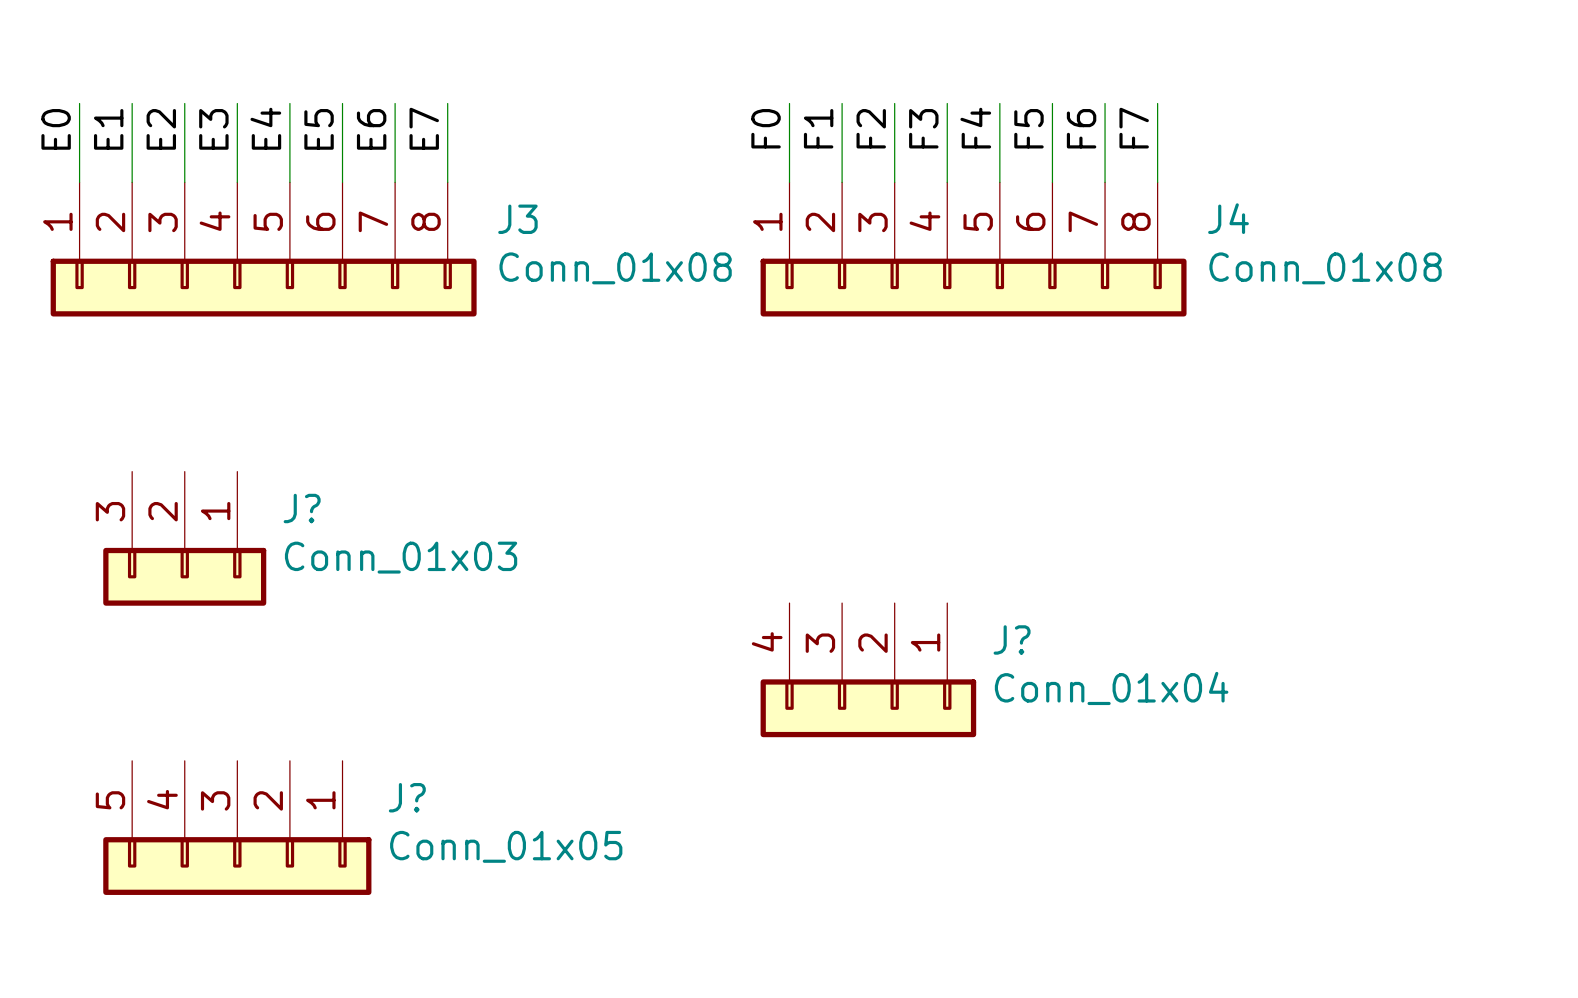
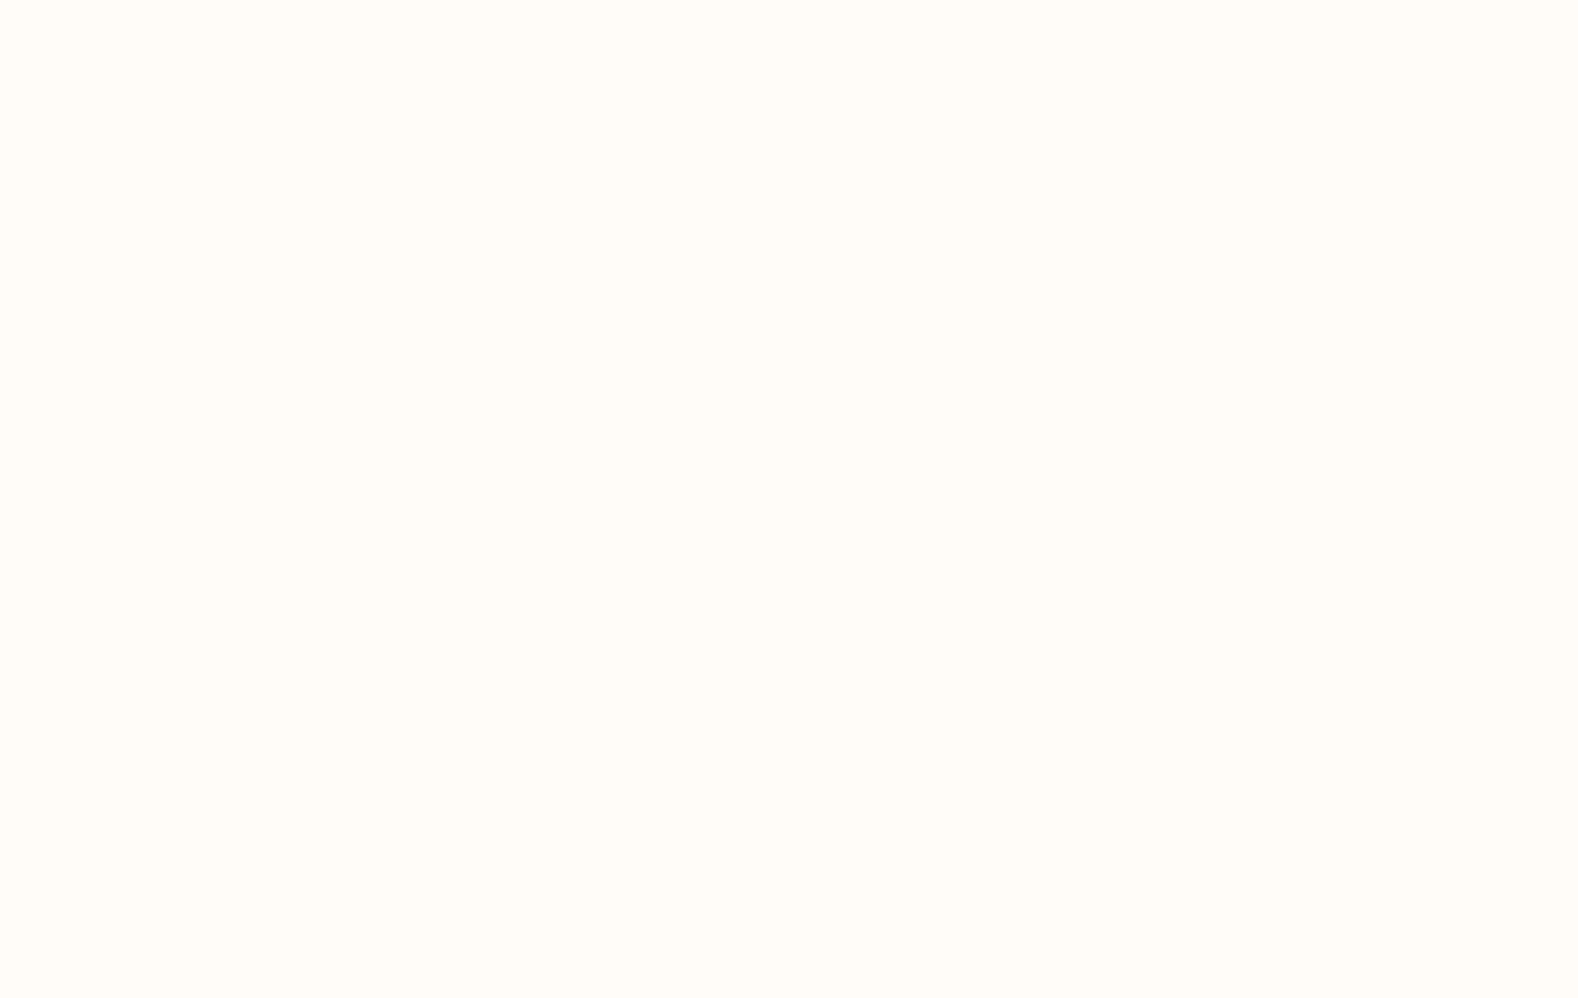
wire: (79, 103) (79, 182) -> none
wire: (132, 103) (132, 182) -> none
wire: (184, 103) (184, 182) -> none
wire: (237, 103) (237, 182) -> none
wire: (289, 103) (289, 182) -> none
wire: (342, 103) (342, 182) -> none
wire: (395, 103) (395, 182) -> none
wire: (447, 103) (447, 182) -> none
wire: (789, 103) (789, 182) -> none
wire: (842, 103) (842, 182) -> none
wire: (894, 103) (894, 182) -> none
wire: (947, 103) (947, 182) -> none
wire: (999, 103) (999, 182) -> none
wire: (1052, 103) (1052, 182) -> none
wire: (1105, 103) (1105, 182) -> none
wire: (1157, 103) (1157, 182) -> none
label: E4 (265, 128) -> none
label: E7 (424, 128) -> none
label: F0 (766, 128) -> none
label: F1 (818, 128) -> none
label: F2 (871, 128) -> none
label: F3 (923, 128) -> none
label: F4 (975, 128) -> none
label: F5 (1028, 128) -> none
label: F6 (1081, 128) -> none
label: F7 (1134, 128) -> none
label: E0 (56, 129) -> none
label: E1 (108, 129) -> none
label: E2 (161, 129) -> none
label: E3 (213, 129) -> none
label: E5 (319, 129) -> none
label: E6 (371, 129) -> none
J3: Conn_01x08 (263, 249) -> none
J4: Conn_01x08 (973, 249) -> none
J?: Conn_01x03 (184, 538) -> none
J?: Conn_01x04 (868, 670) -> none
J?: Conn_01x05 (237, 827) -> none

